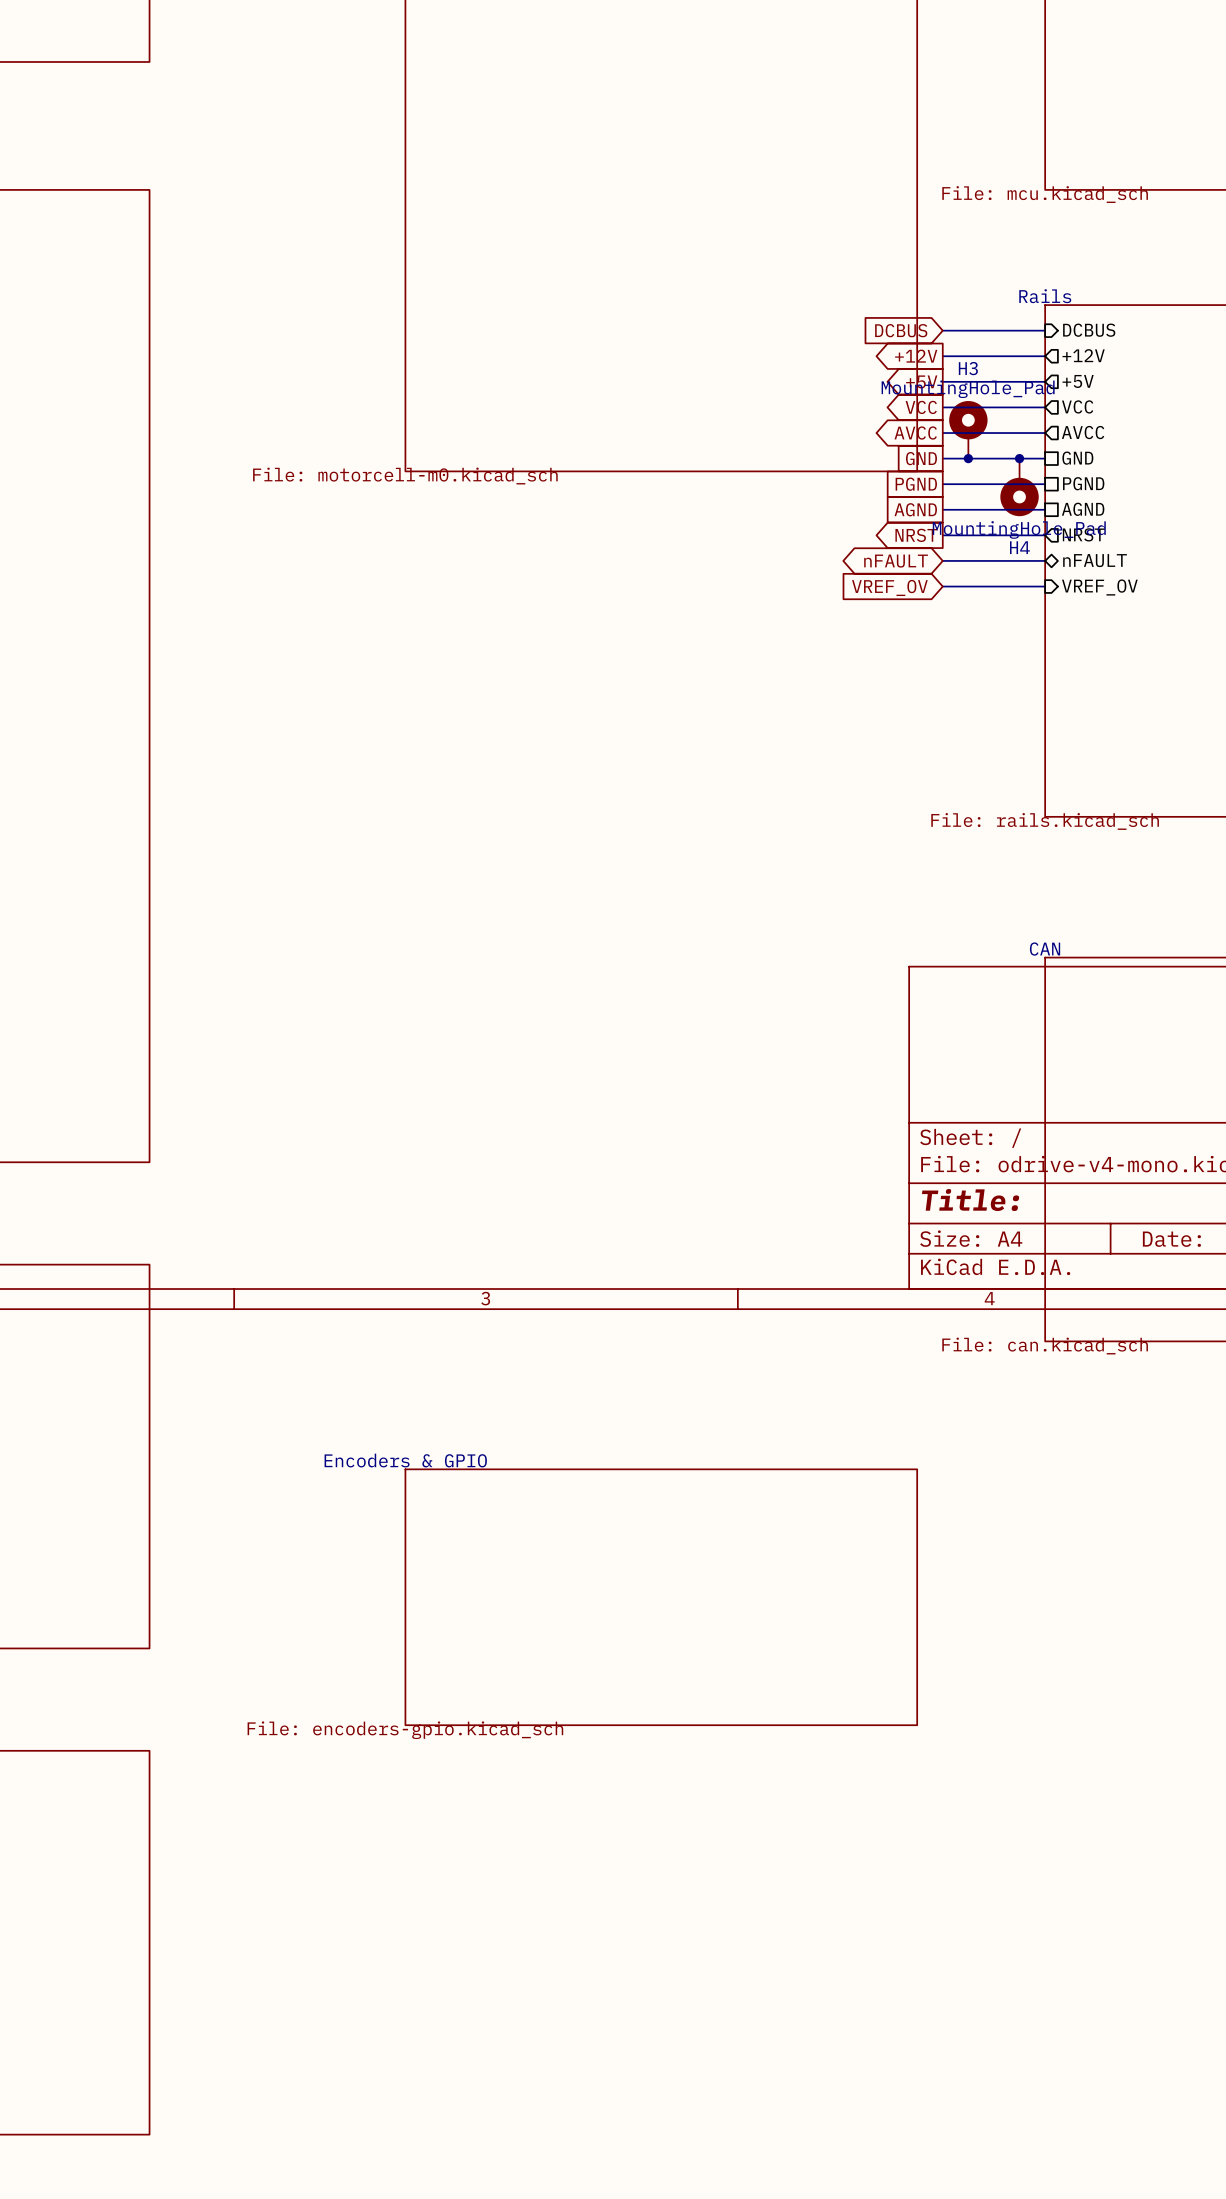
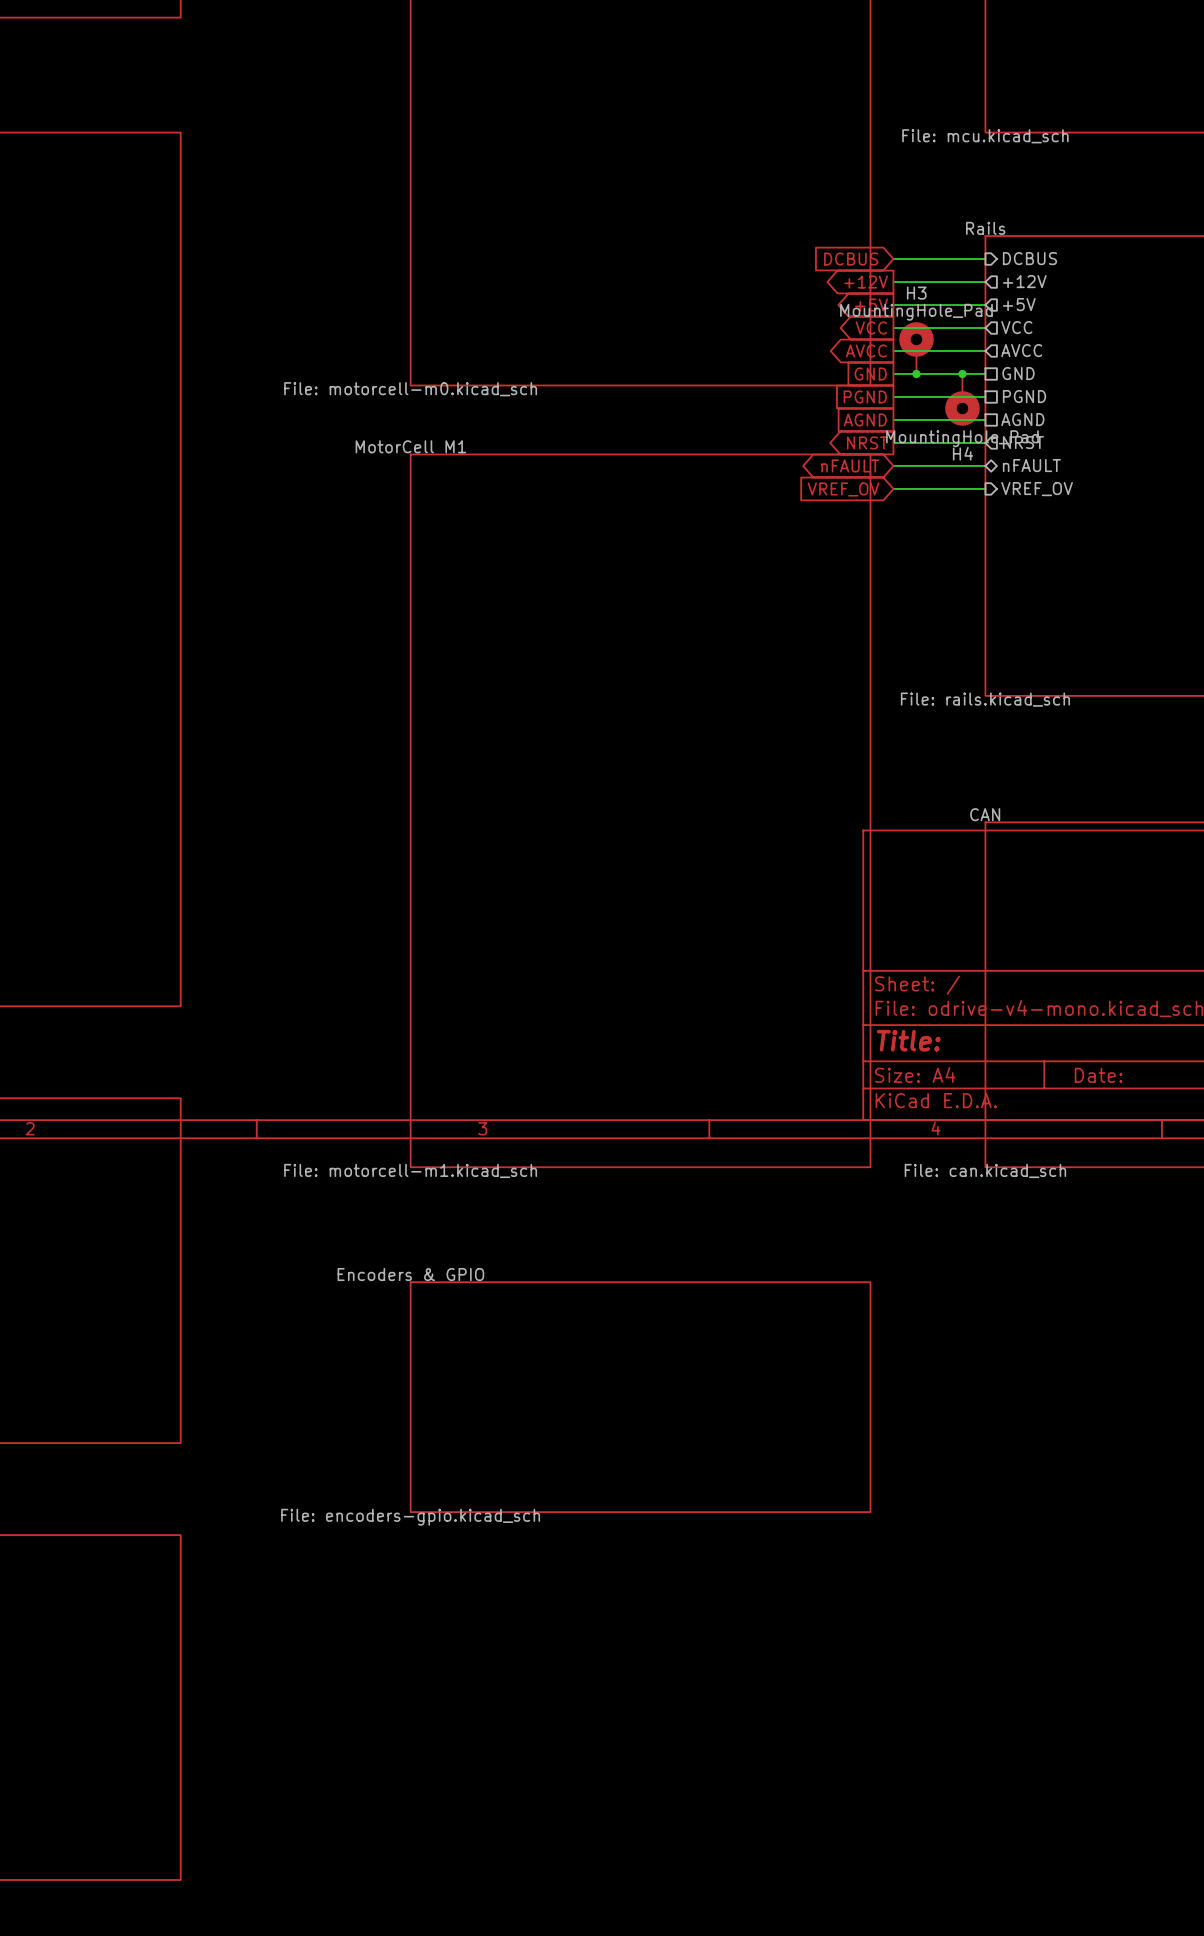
sheet MotorCell M1: none -> File: motorcell-m1.kicad_sch (640, 810)

